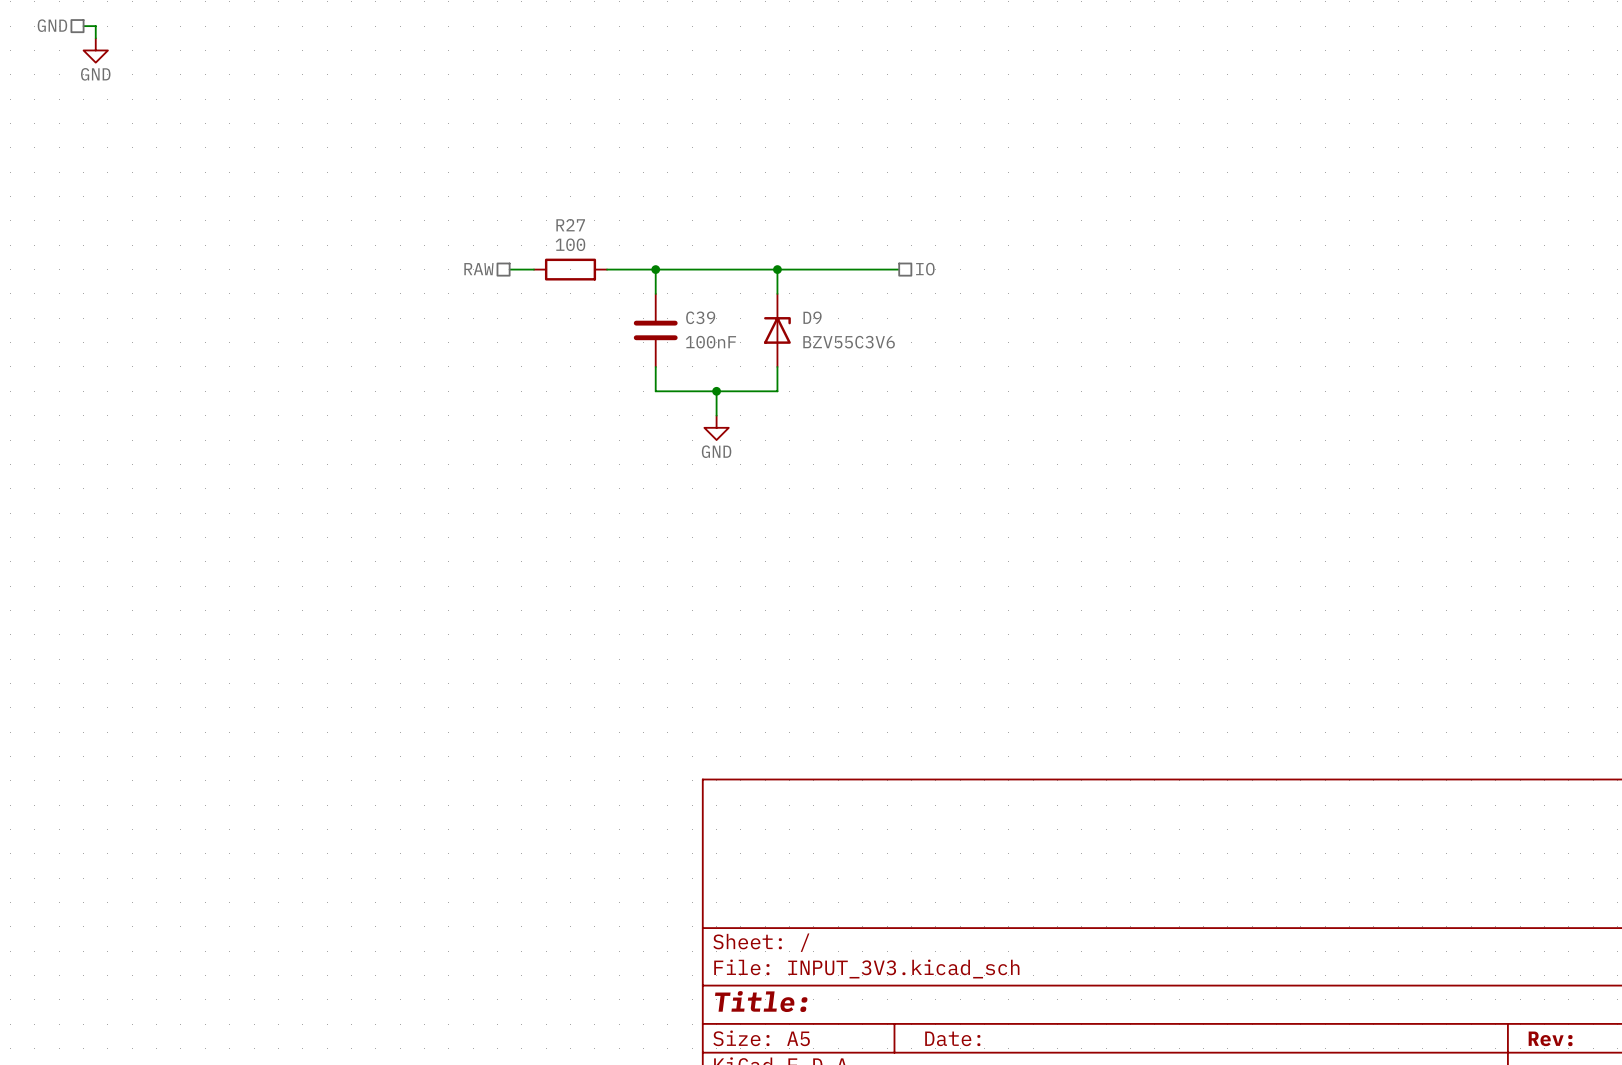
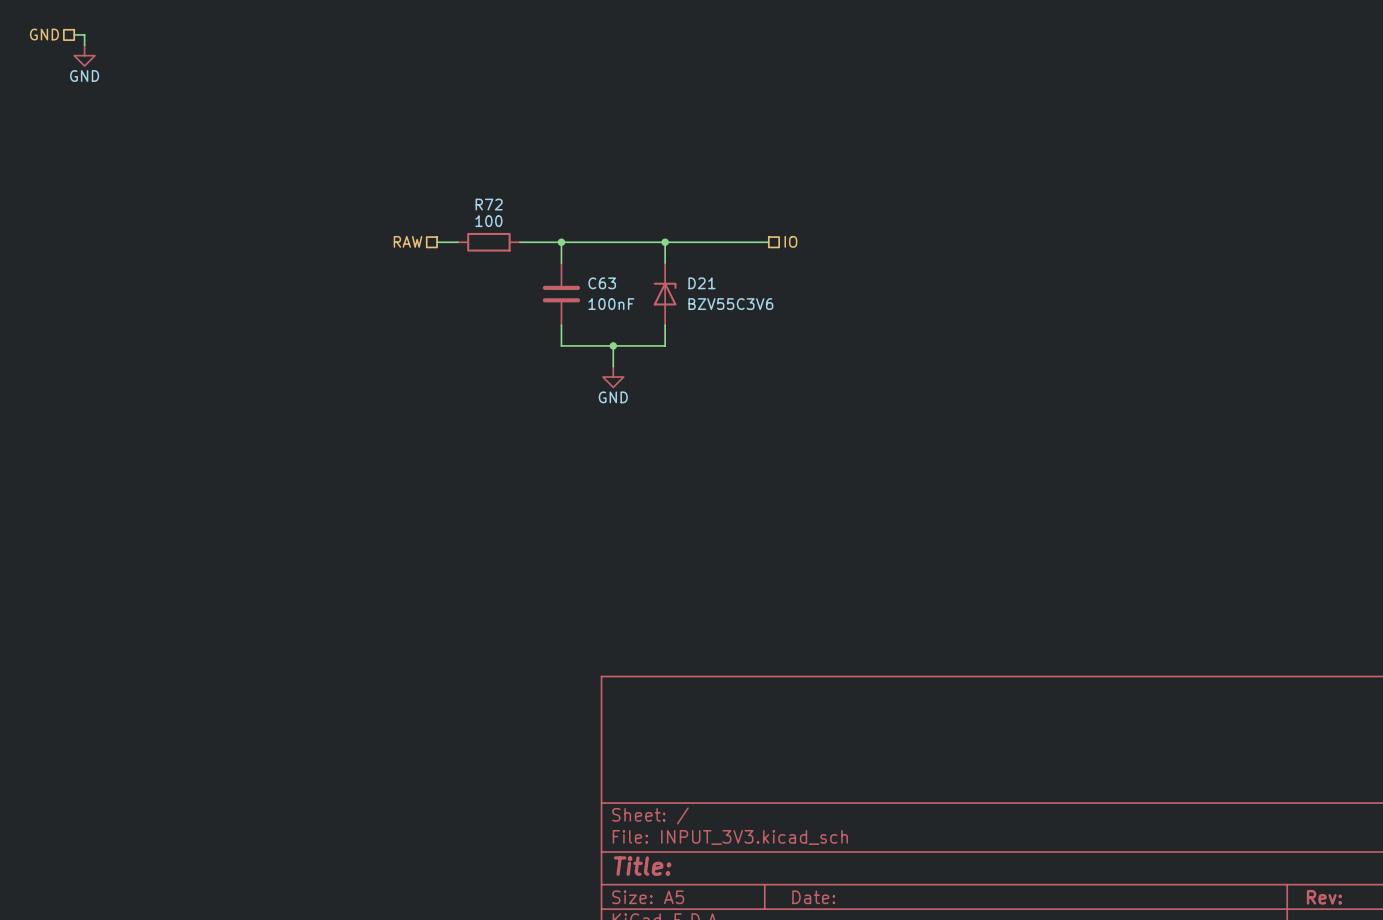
R27 name: R27 (570, 225) -> R72 (489, 204)
C39 name: C39 (700, 317) -> C63 (602, 283)
D9 name: D9 (812, 317) -> D21 (701, 283)

